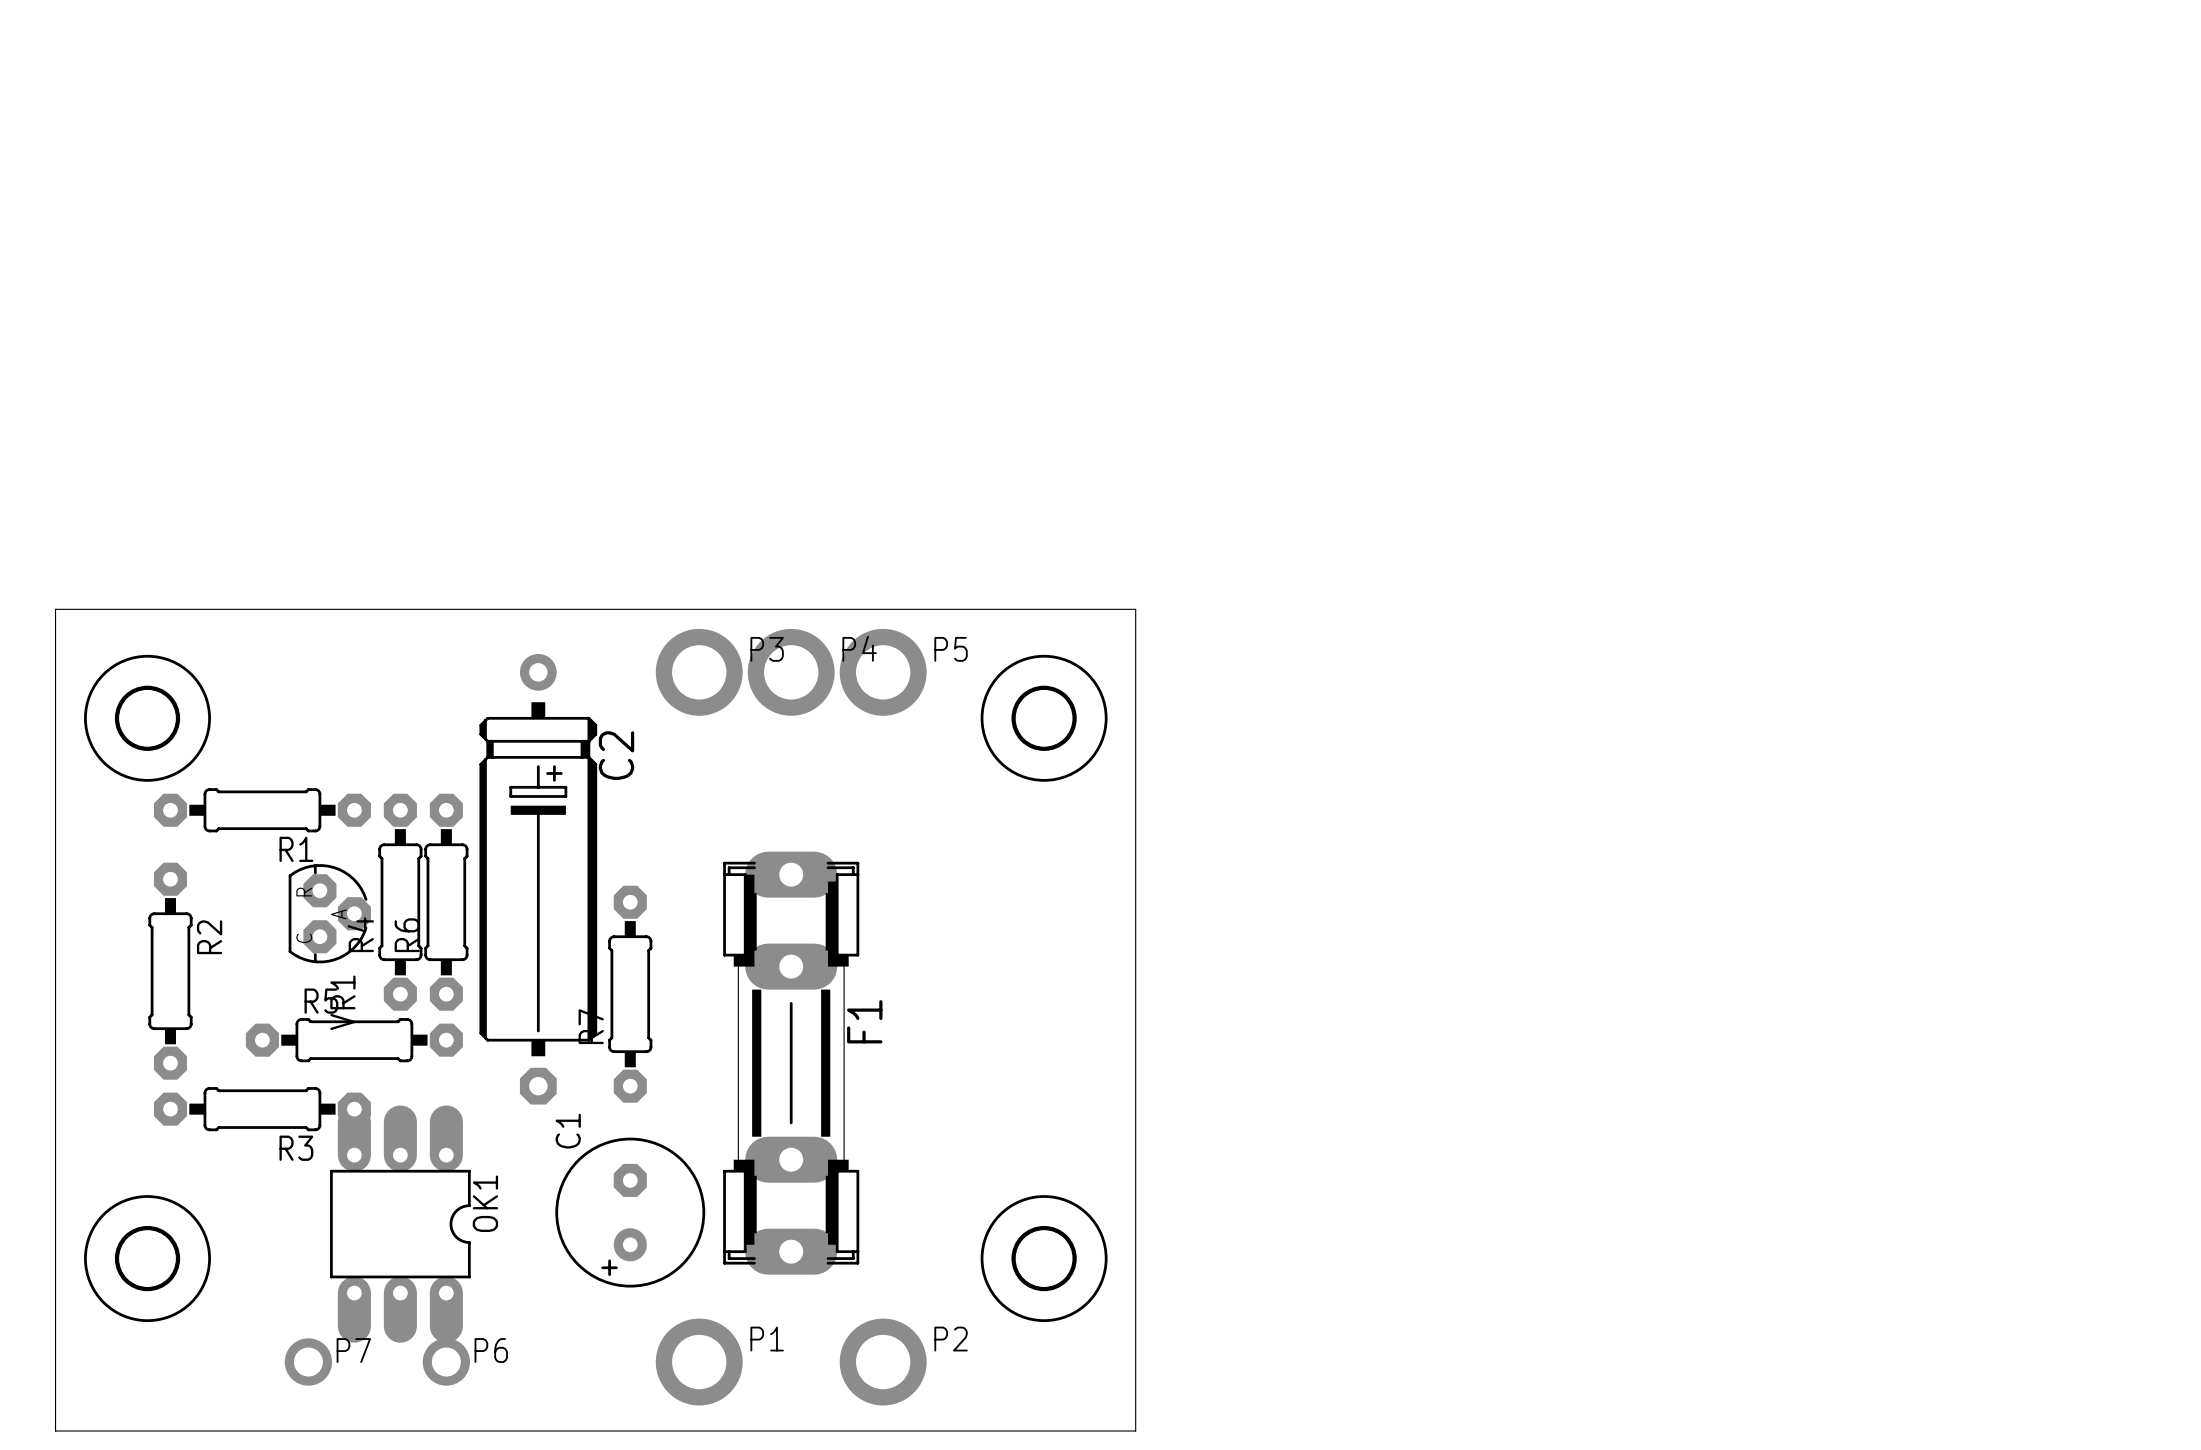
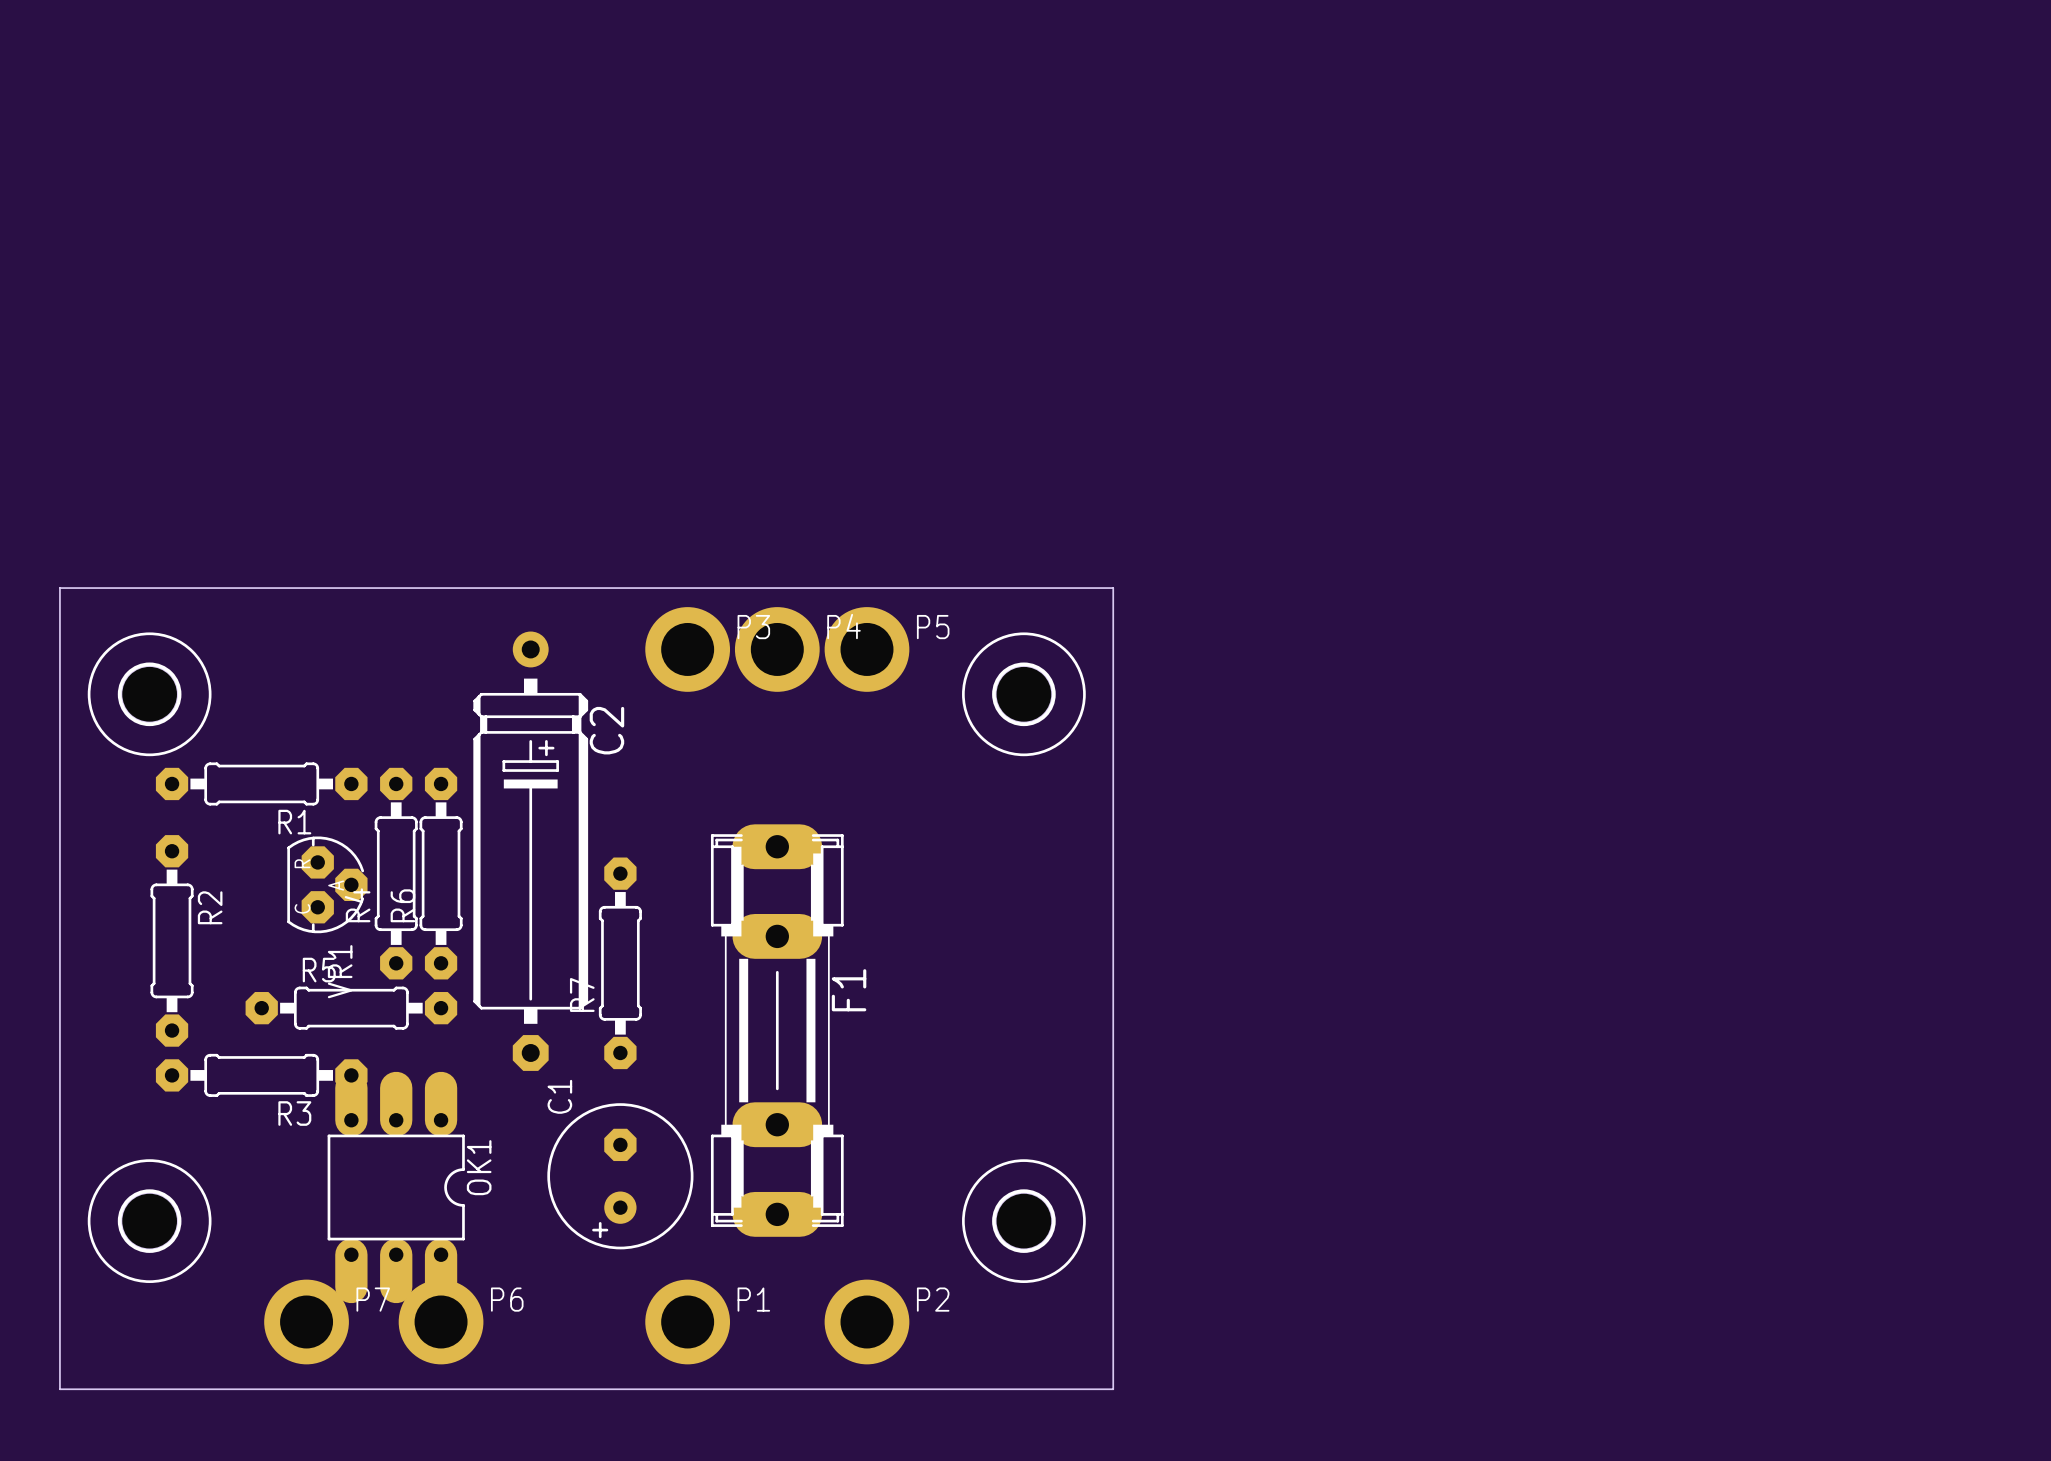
P7 footprint: [284, 1338, 333, 1386] -> [264, 1279, 349, 1365]
P6 footprint: [422, 1338, 471, 1386] -> [398, 1279, 484, 1365]

